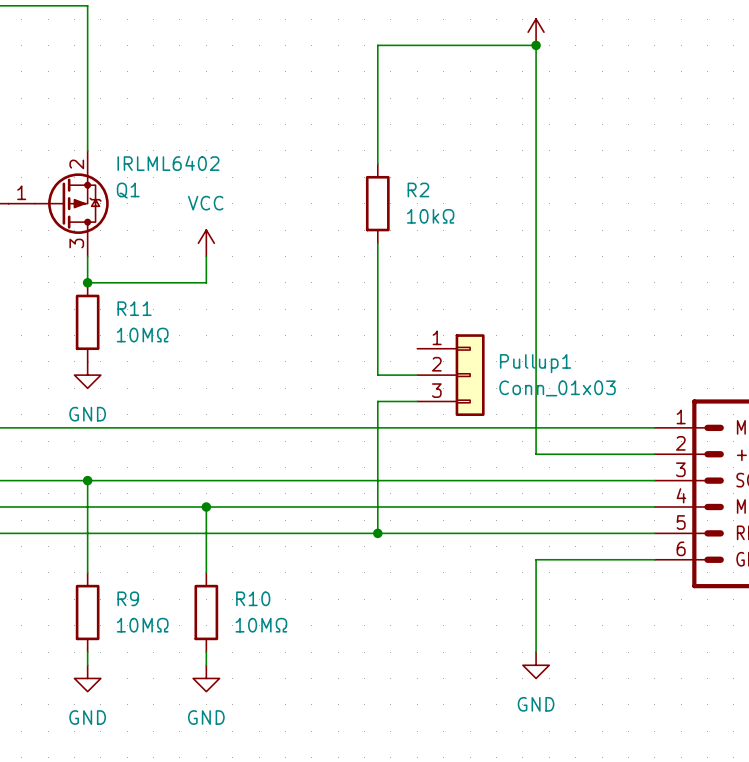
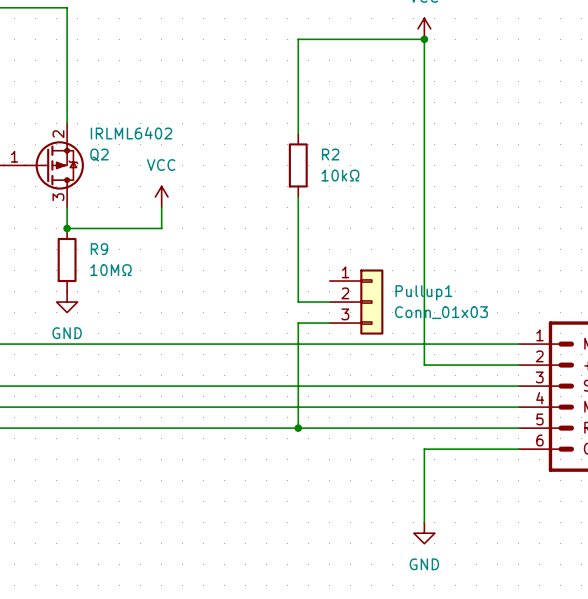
Q1 name: Q1 (128, 190) -> Q2 (99, 155)
R11 name: R11 (134, 308) -> R9 (99, 249)
wire: (87, 480) (87, 572) -> none
junction: (87, 480) -> none
wire: (206, 507) (206, 572) -> none
junction: (206, 507) -> none
R9: 10MΩ (87, 612) -> none
R10: 10MΩ (206, 612) -> none
wire: (87, 652) (87, 665) -> none
wire: (206, 652) (206, 665) -> none
power symbol: GND (87, 678) -> none
power symbol: GND (206, 678) -> none

